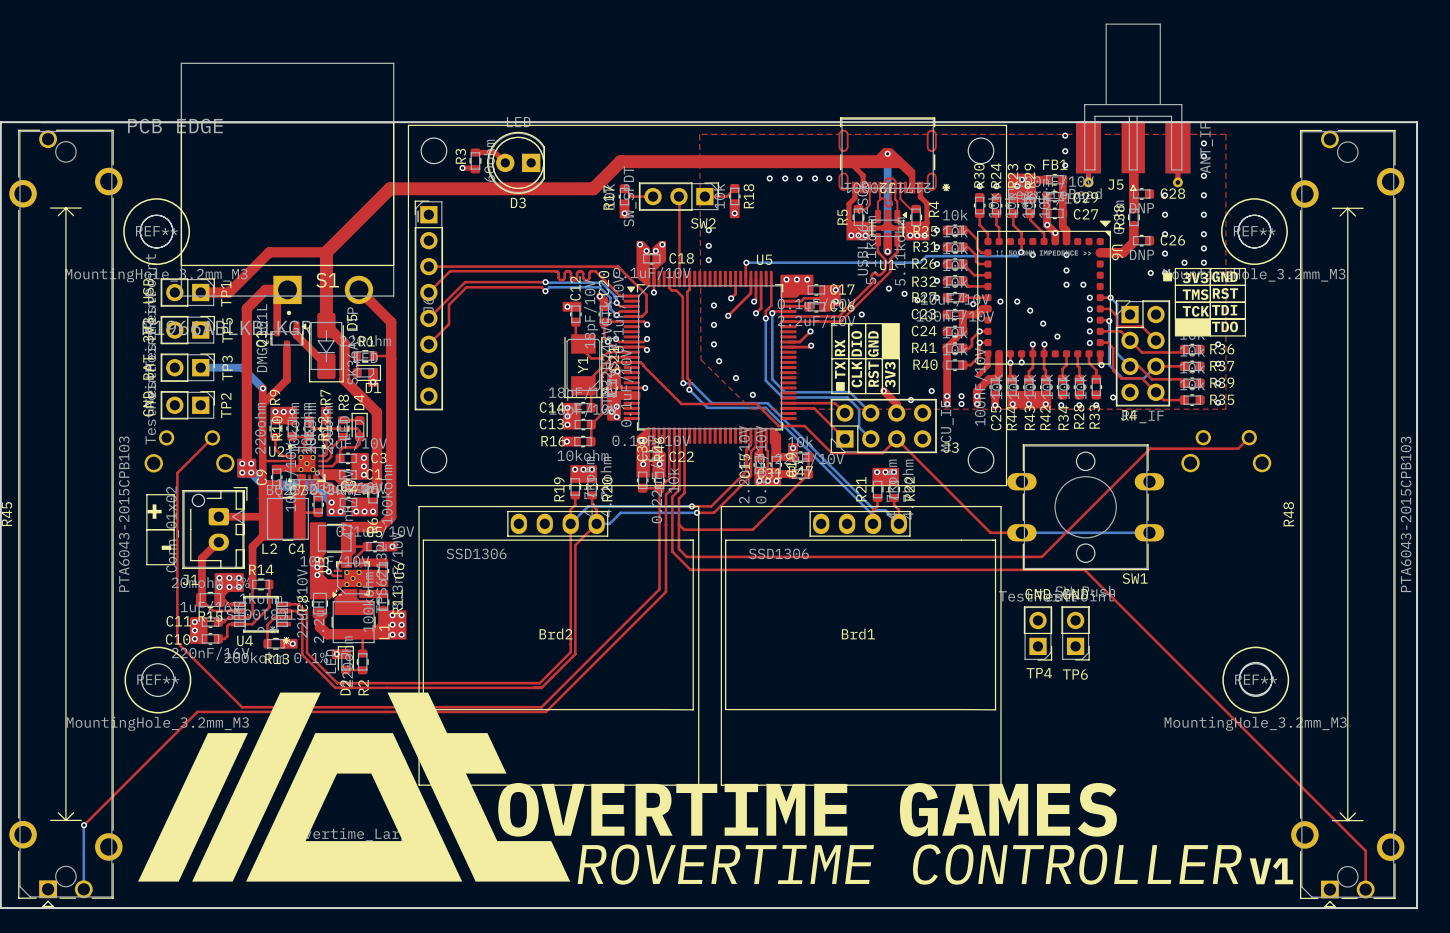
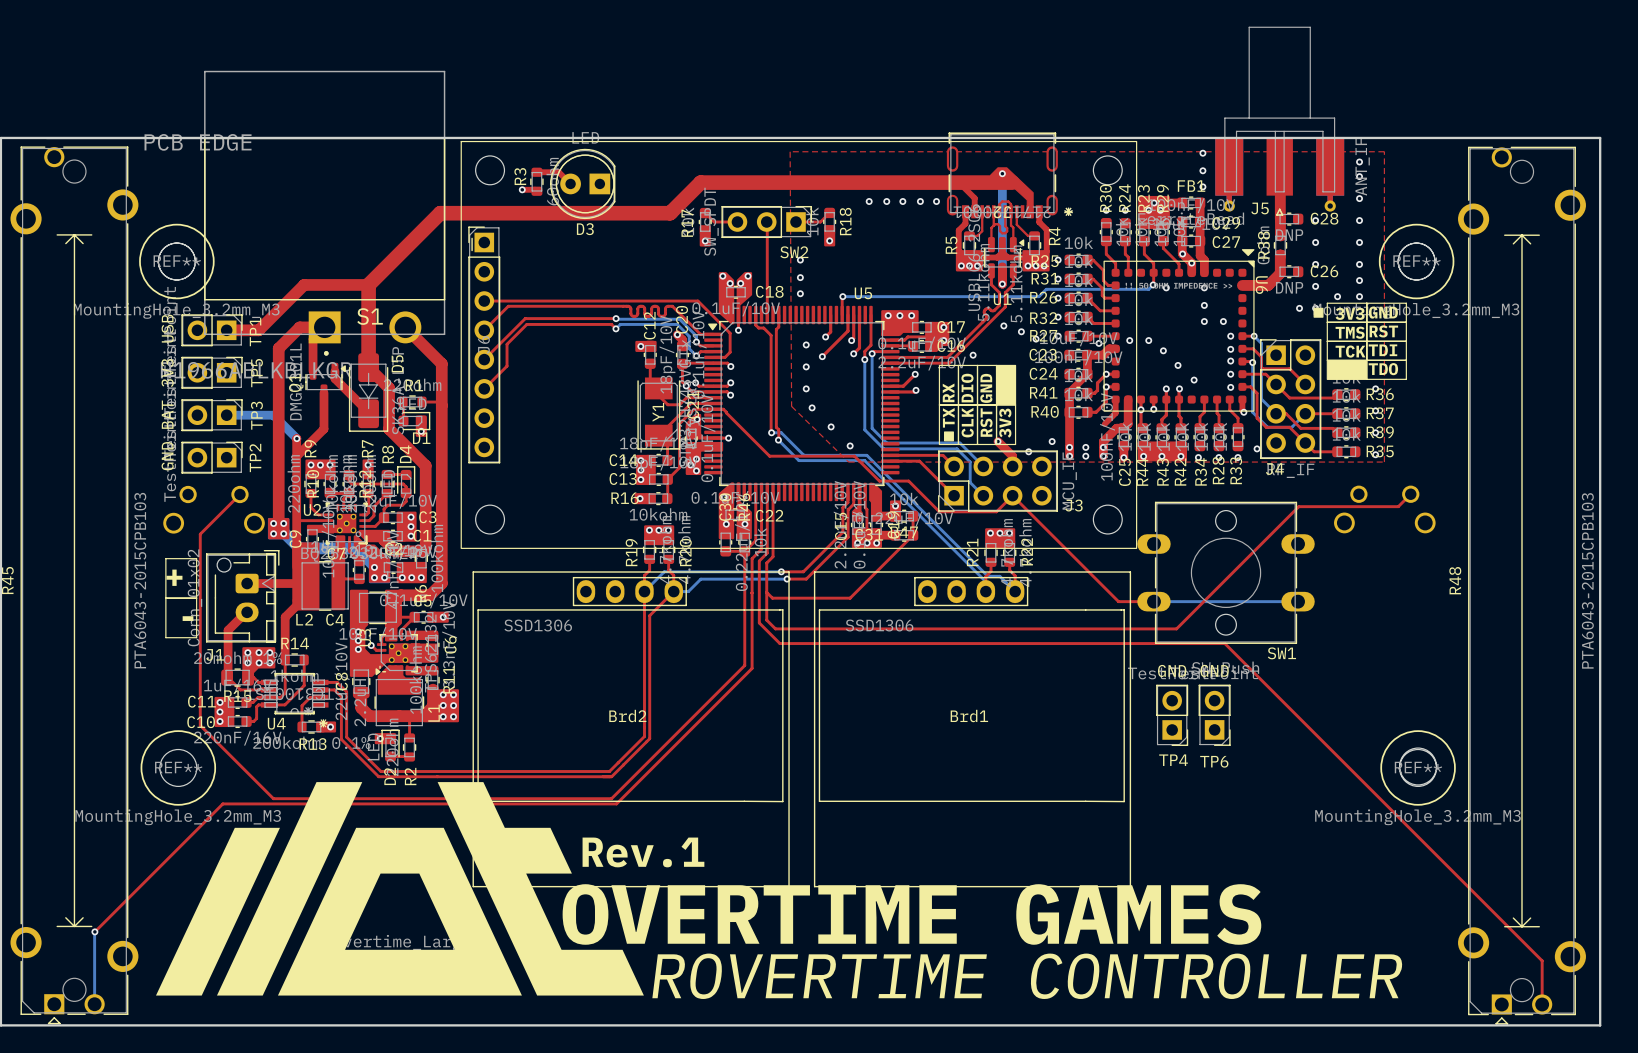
text: none -> Rev.1 (643, 852)
text: V1 (1271, 871) -> none

